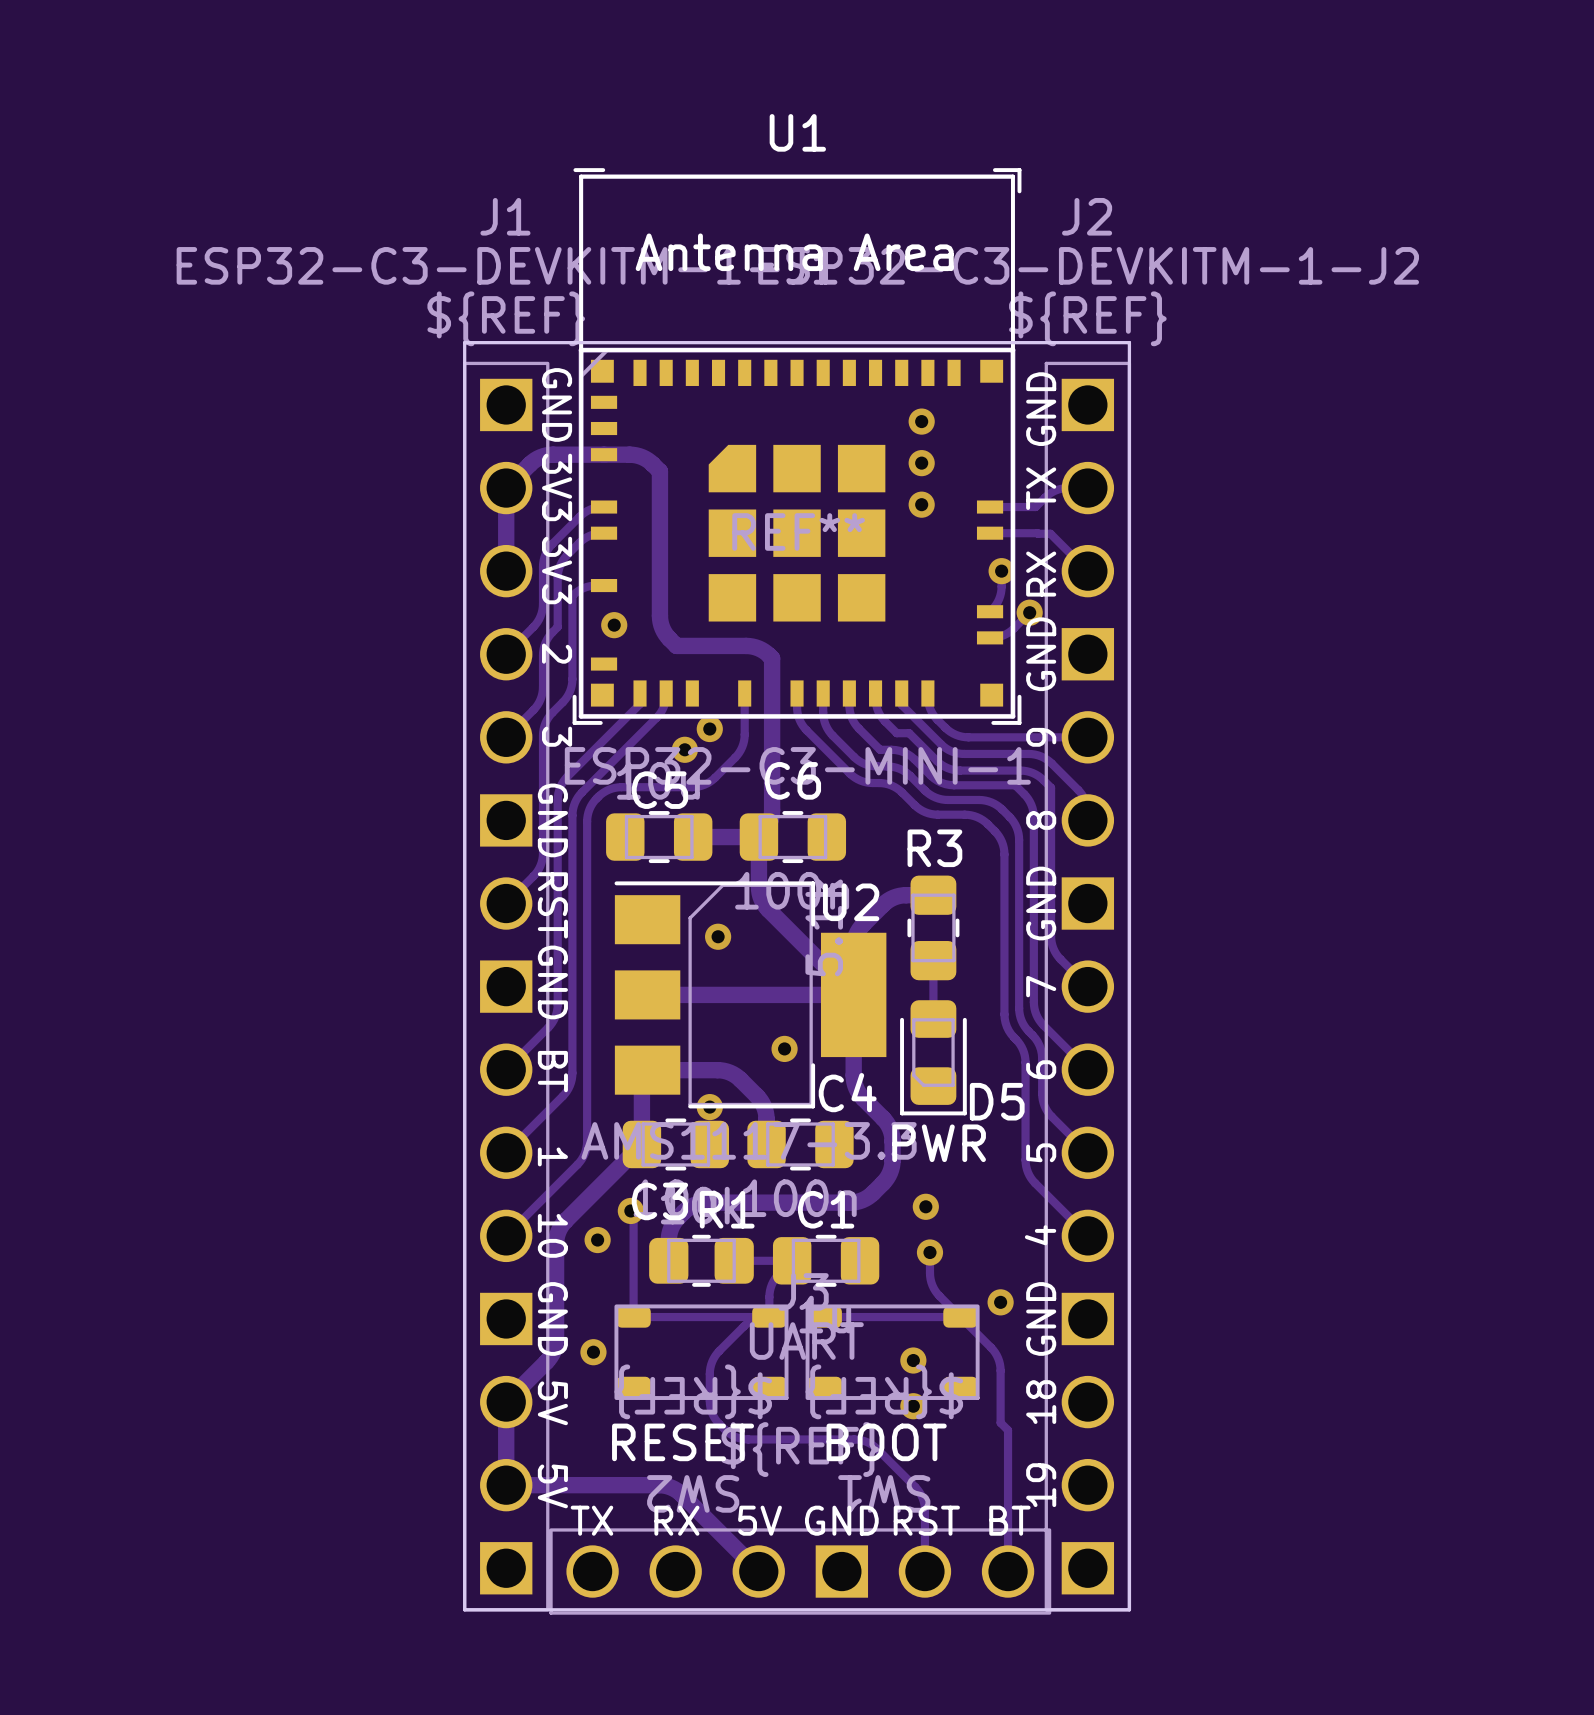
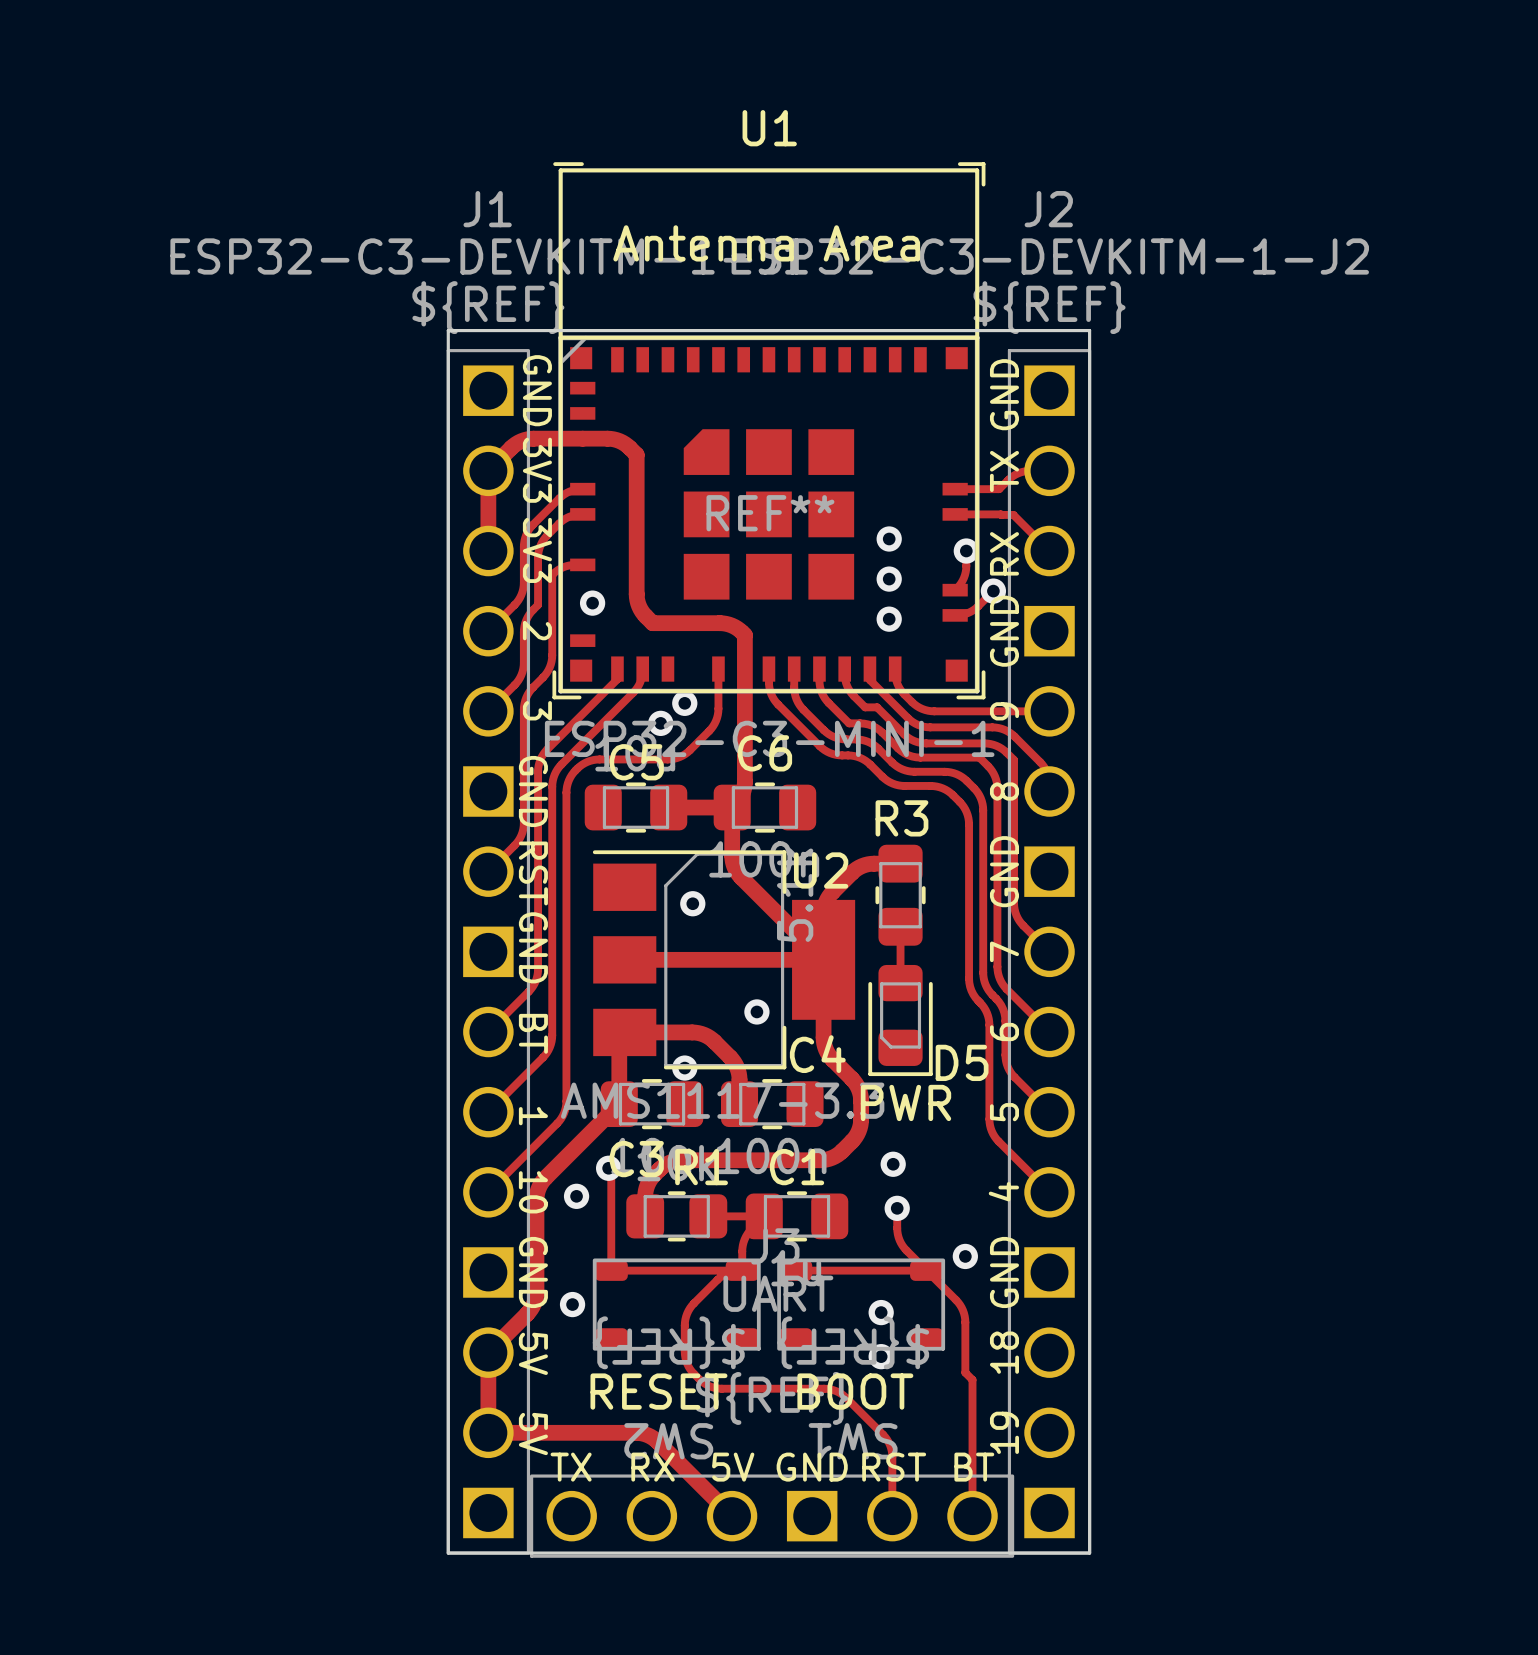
via: (921, 421) -> none
via: (921, 463) -> none
via: (921, 504) -> none
via: none -> (889, 538)
via: none -> (889, 579)
via: none -> (889, 619)

